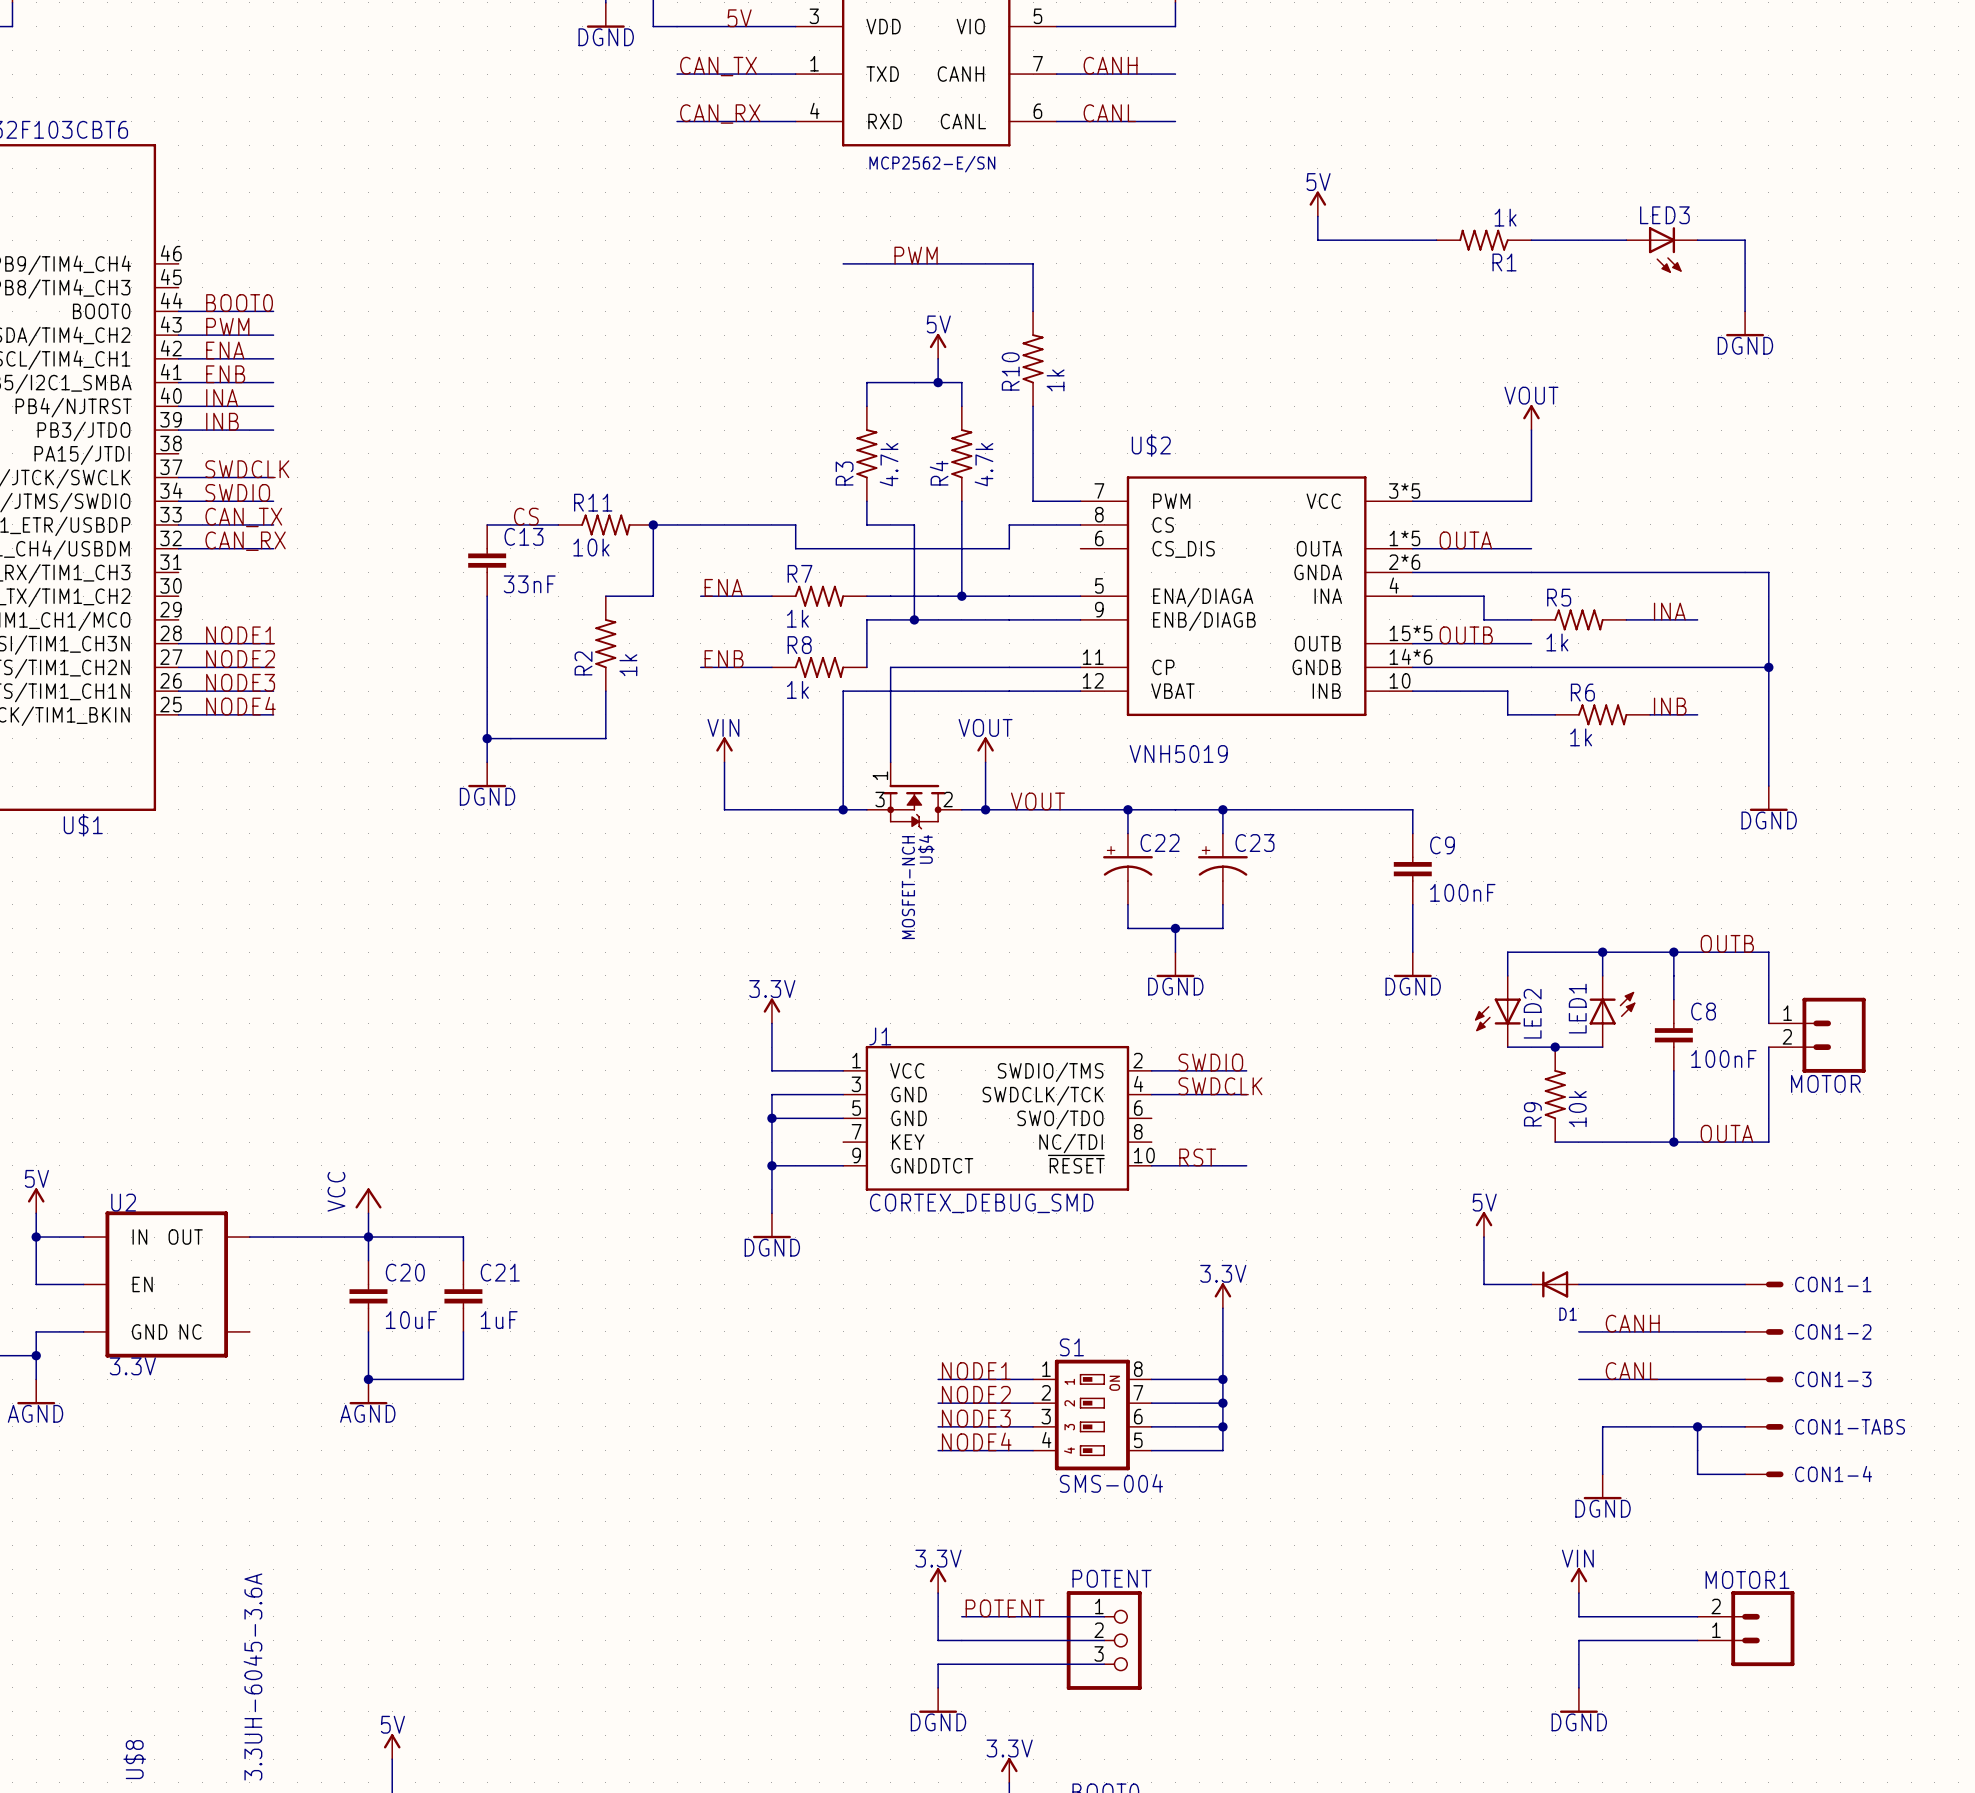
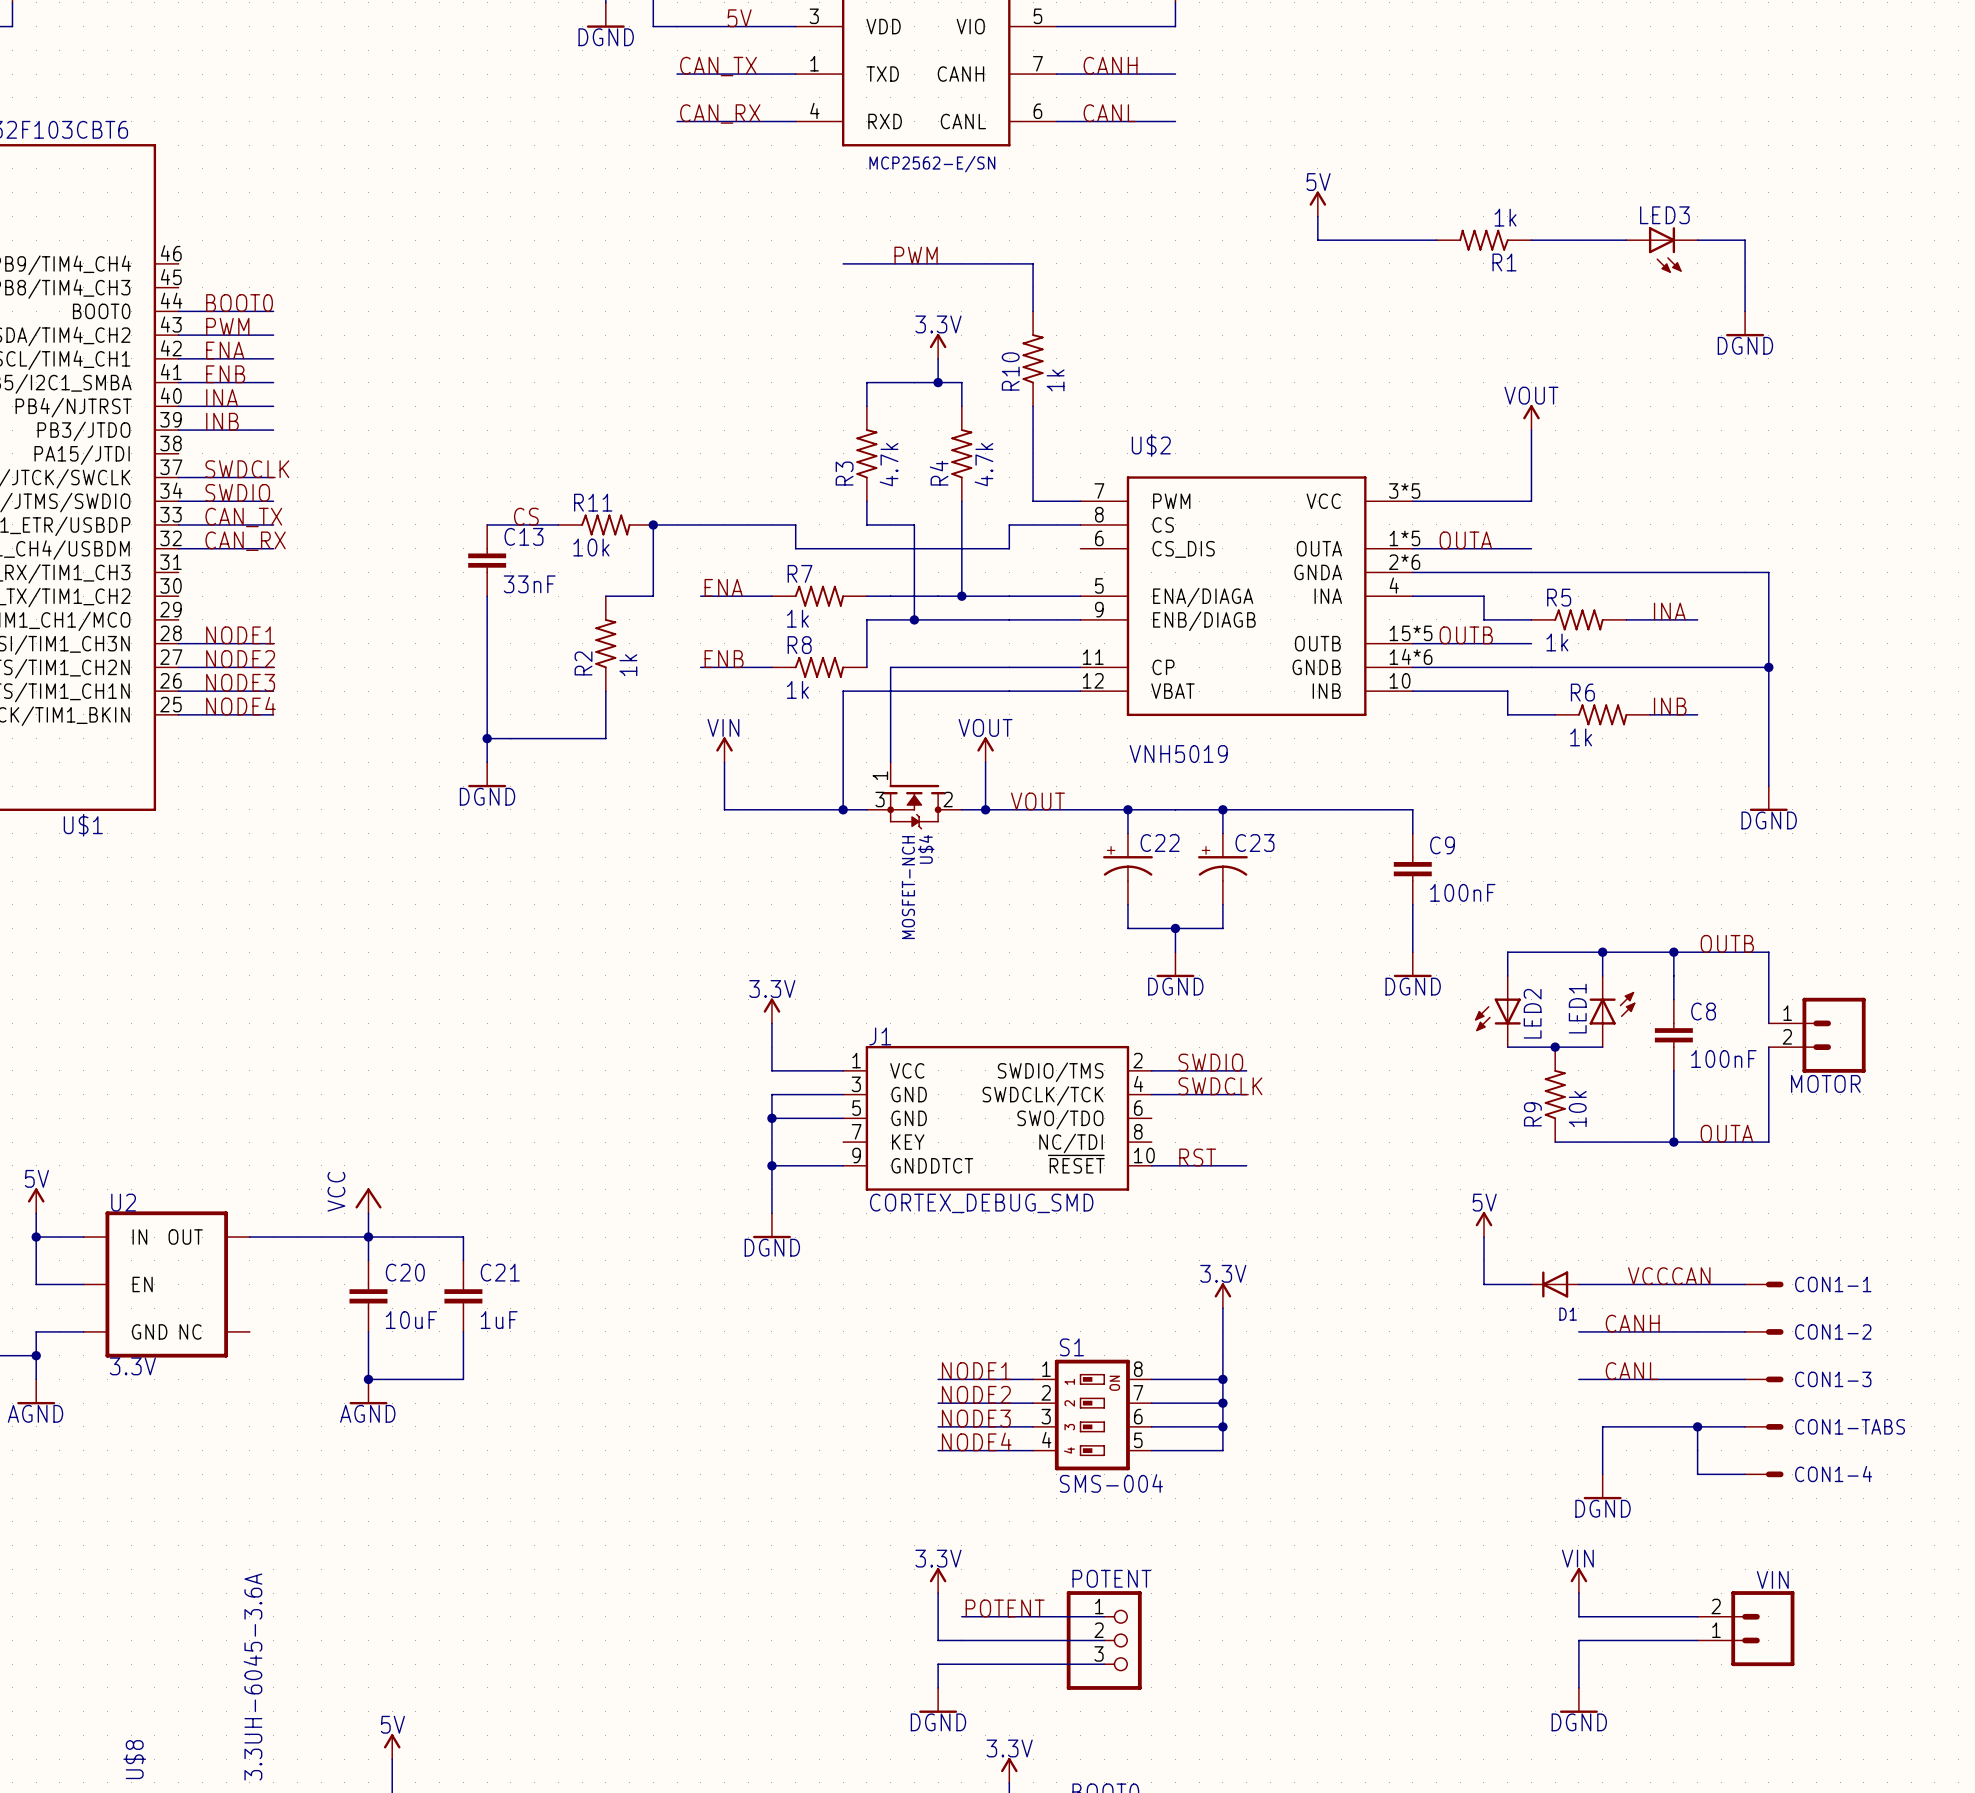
power symbol: 5V (938, 346) -> 3.3V (938, 346)
label: none -> VCCCAN (1669, 1276)
MOTOR1 name: MOTOR1 (1747, 1579) -> VIN (1772, 1579)

